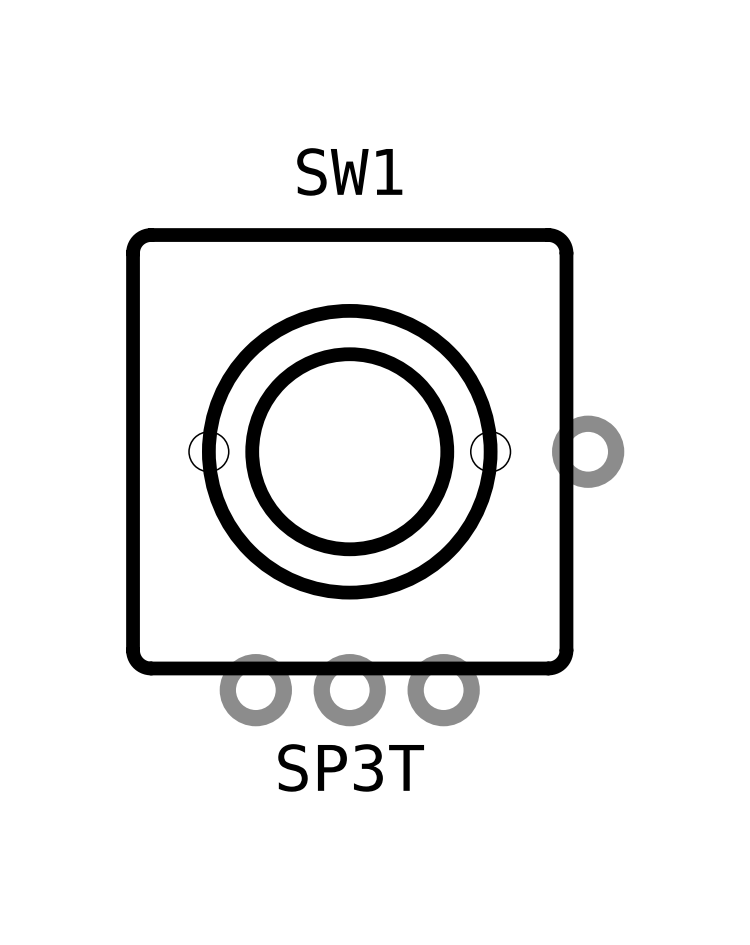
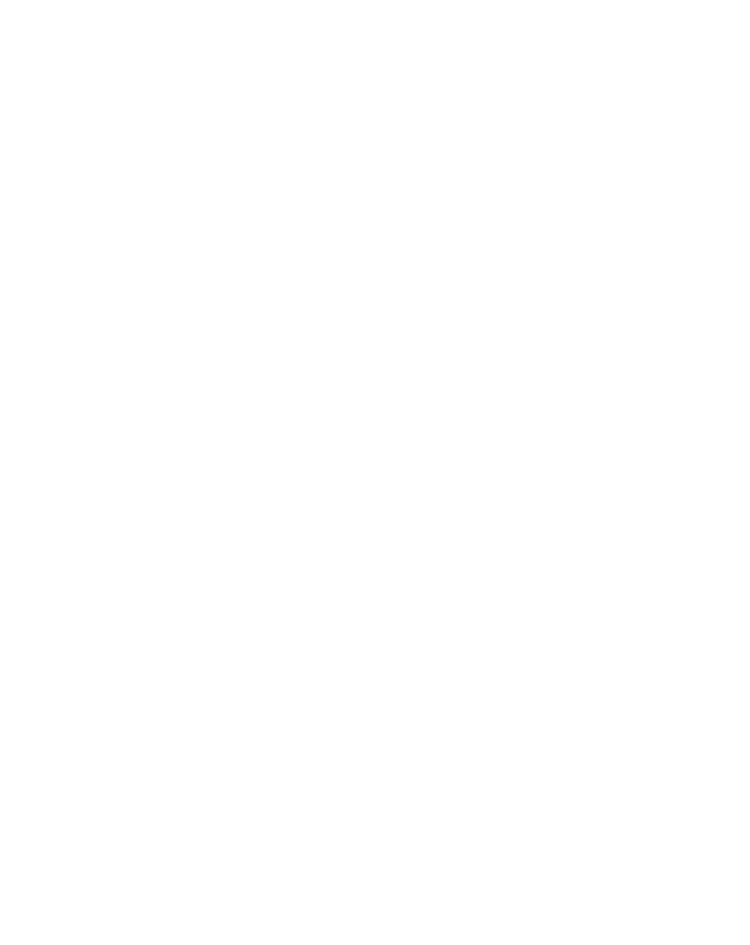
SW1: SP3T (375, 477) -> none

